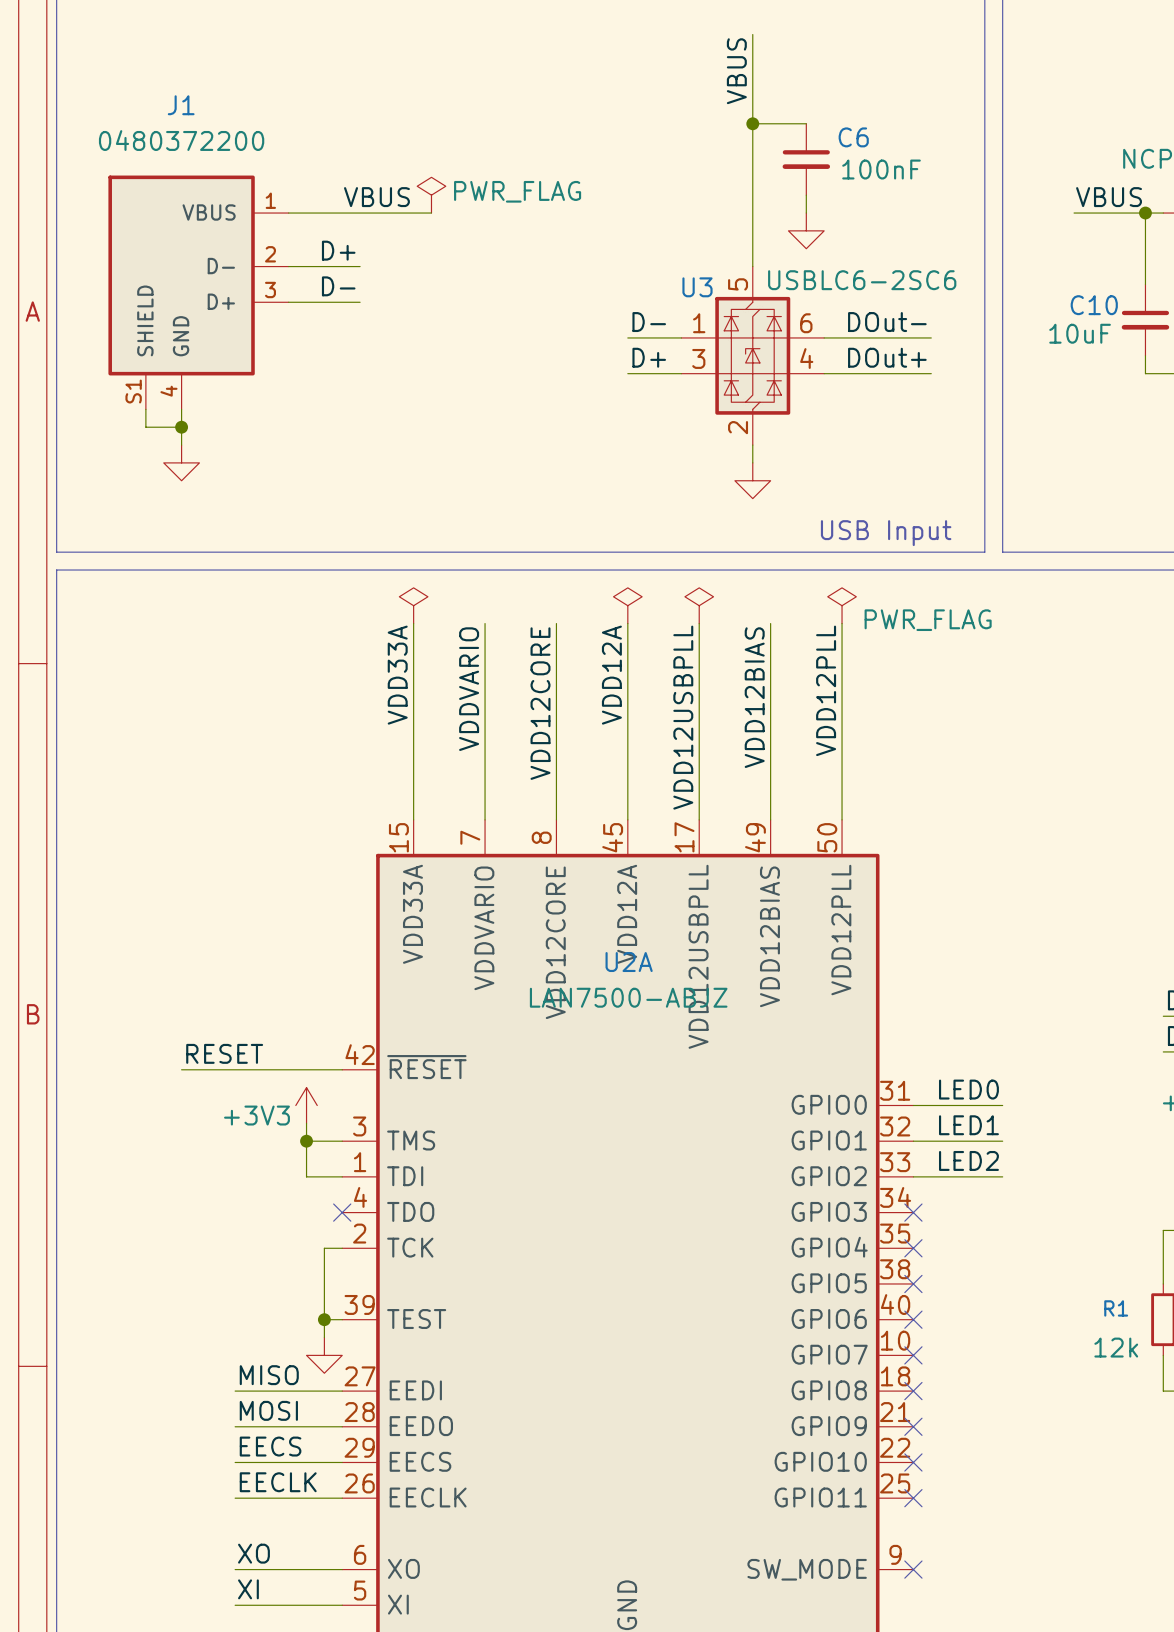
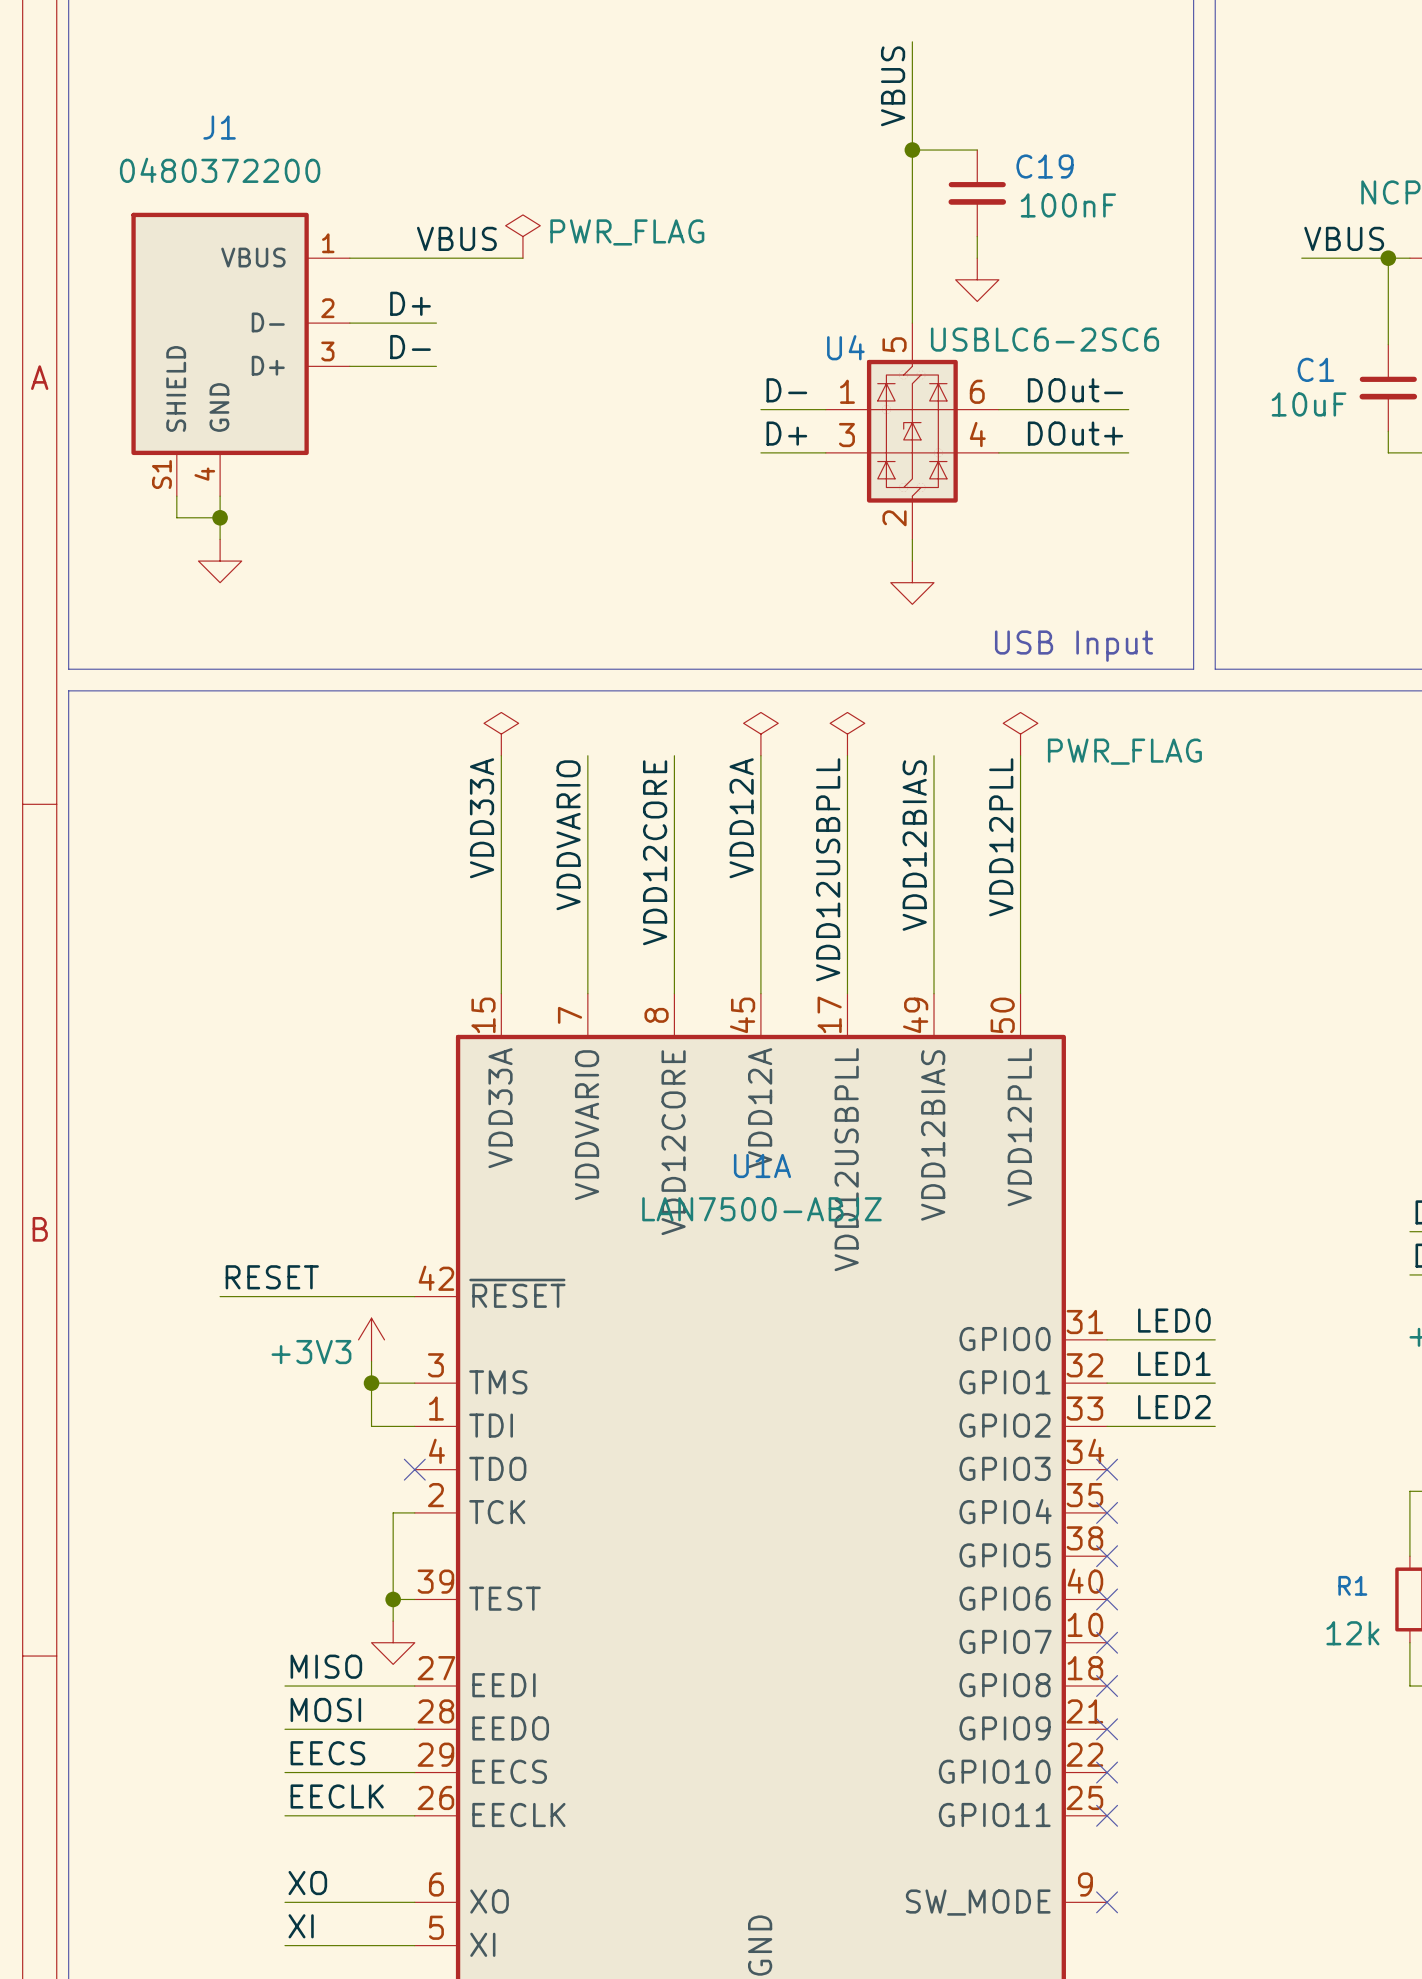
C6 name: C6 (853, 137) -> C19 (1045, 166)
U3 name: U3 (697, 287) -> U4 (845, 347)
C10 name: C10 (1094, 305) -> C1 (1315, 369)
U2A name: U2A (629, 962) -> U1A (762, 1165)

